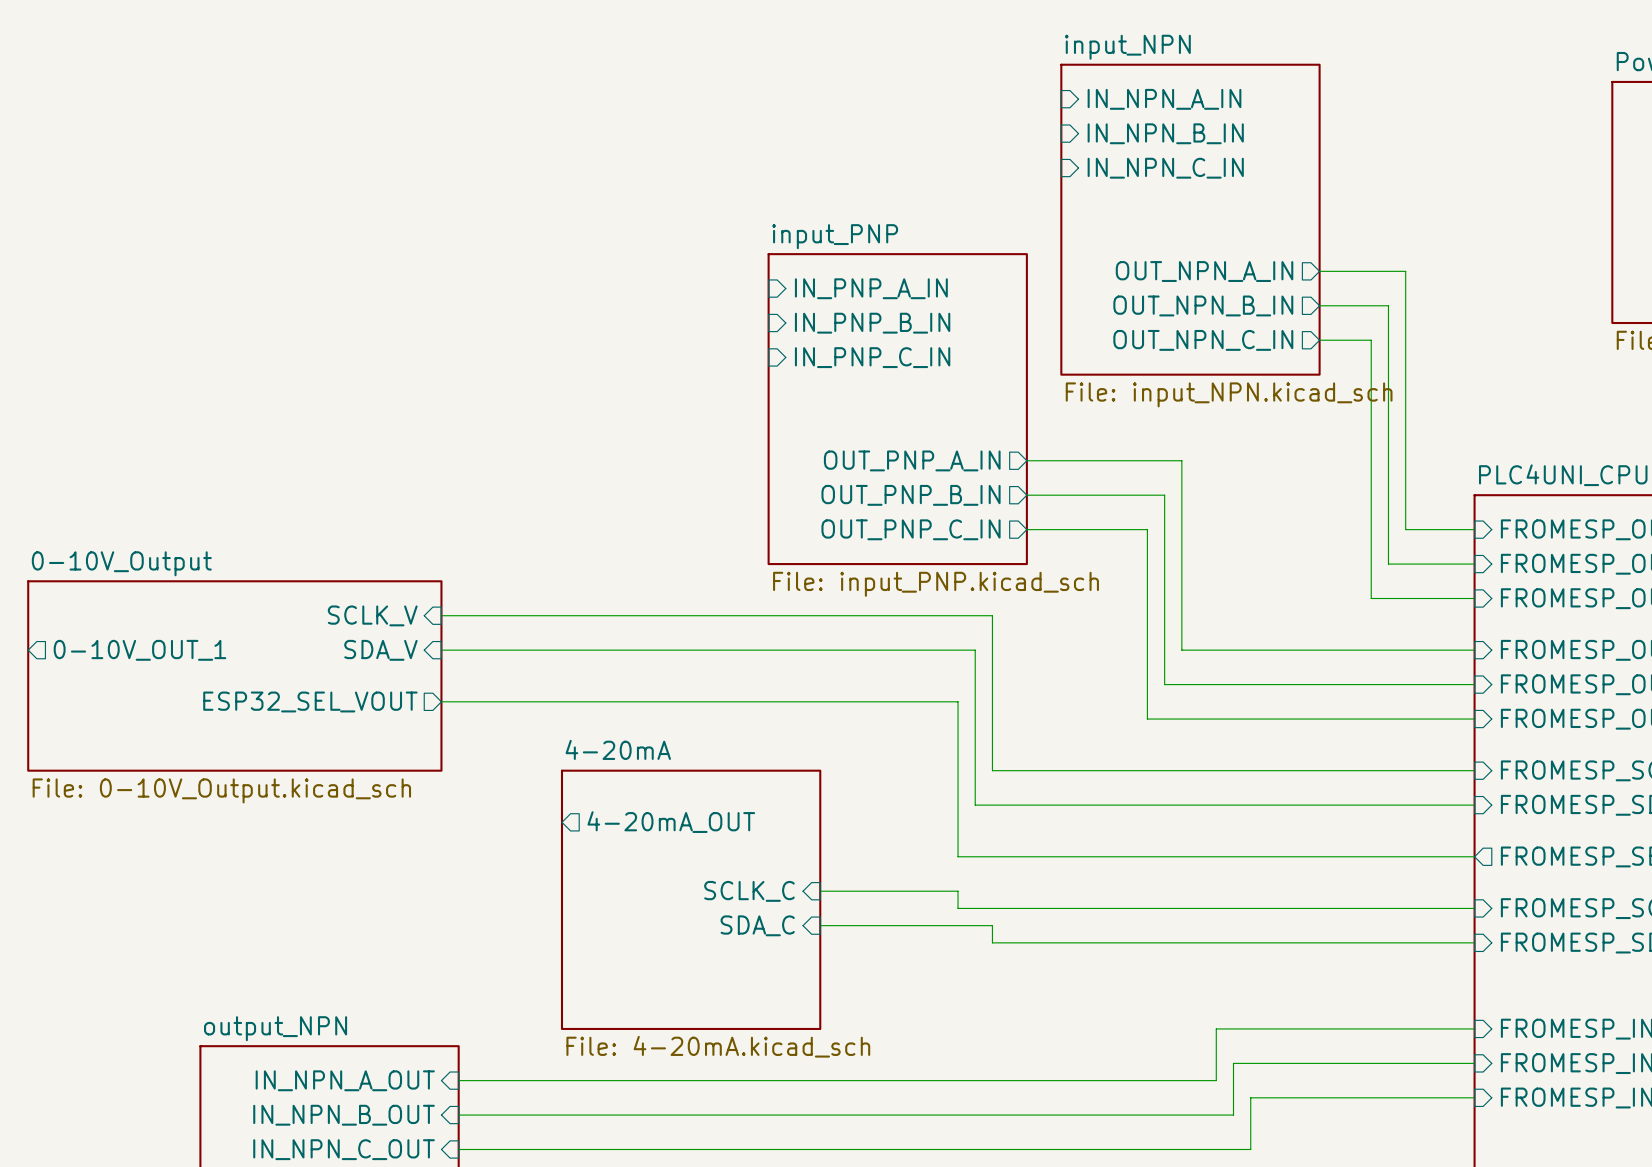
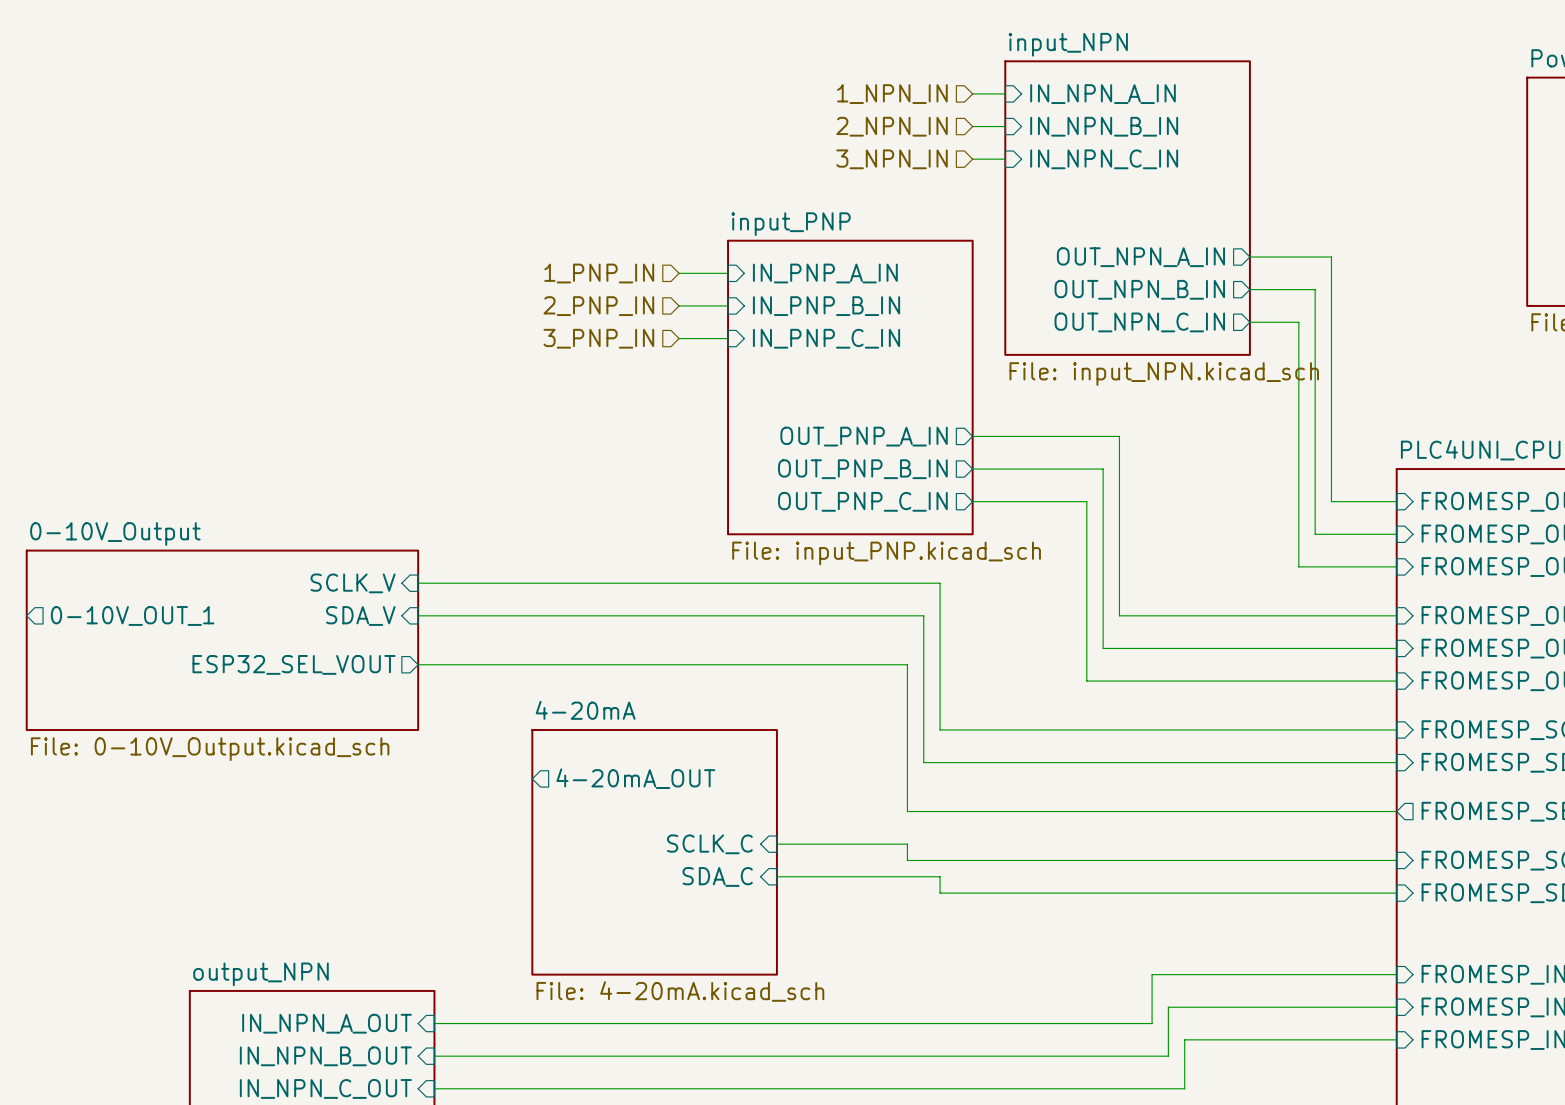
hierarchical label: none -> 1_NPN_IN (892, 94)
wire: none -> (972, 93) (1005, 93)
hierarchical label: none -> 2_NPN_IN (892, 126)
wire: none -> (972, 126) (1005, 126)
hierarchical label: none -> 3_NPN_IN (892, 159)
wire: none -> (972, 159) (1005, 159)
hierarchical label: none -> 1_PNP_IN (599, 273)
wire: none -> (679, 273) (728, 273)
hierarchical label: none -> 2_PNP_IN (598, 306)
wire: none -> (679, 305) (728, 305)
hierarchical label: none -> 3_PNP_IN (598, 338)
wire: none -> (679, 338) (728, 338)

